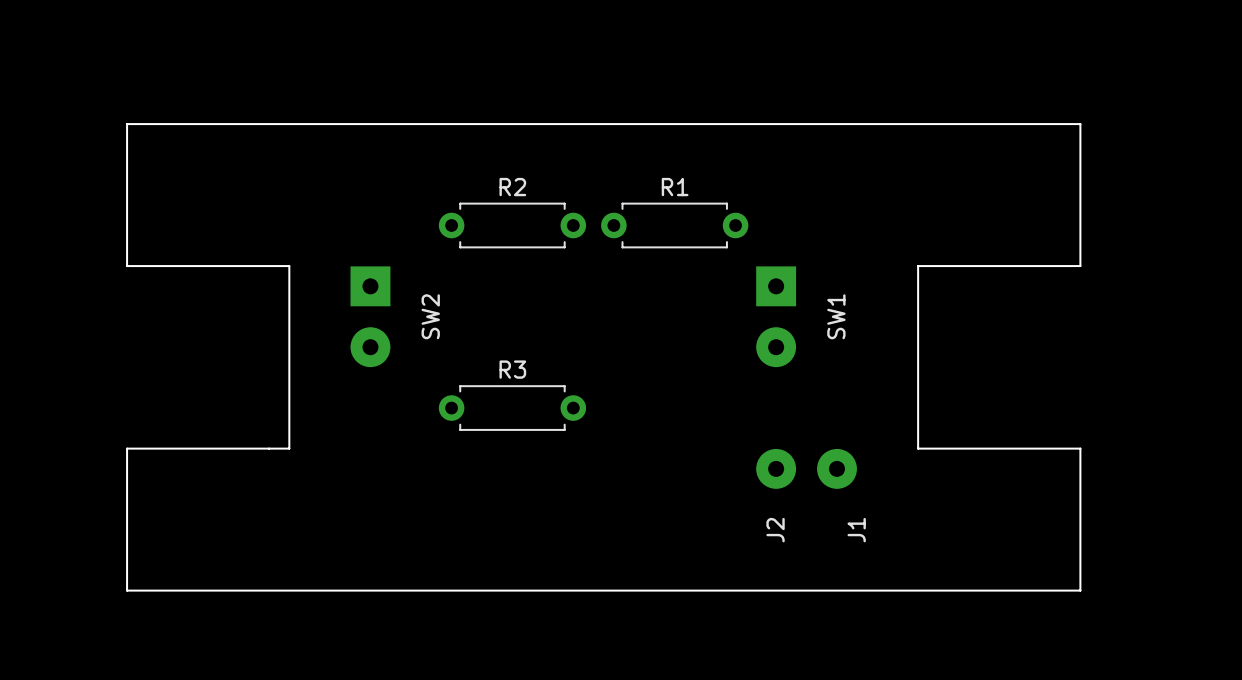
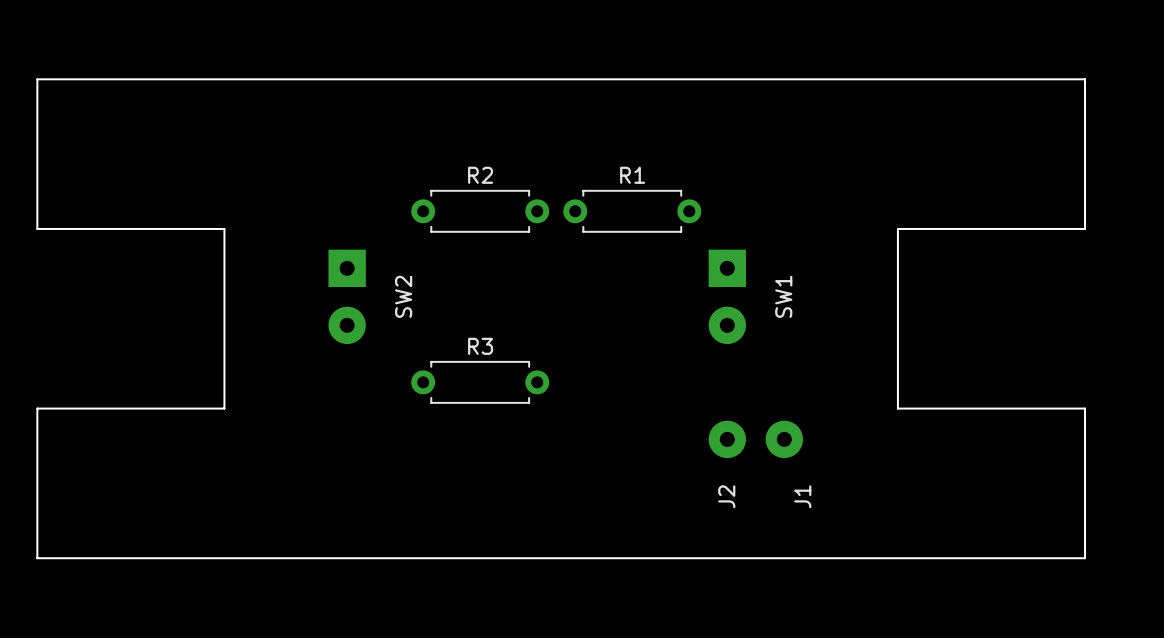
board edge: (127, 124) (127, 266) (289, 266) (289, 448) (127, 448) (127, 590) (1080, 590) (1080, 448) (918, 448) (918, 266) (1080, 266) (1080, 124) (127, 124) -> (37, 79) (37, 228) (224, 228) (224, 408) (37, 408) (37, 558) (1085, 558) (1085, 408) (897, 408) (897, 228) (1085, 228) (1085, 79) (37, 79)

